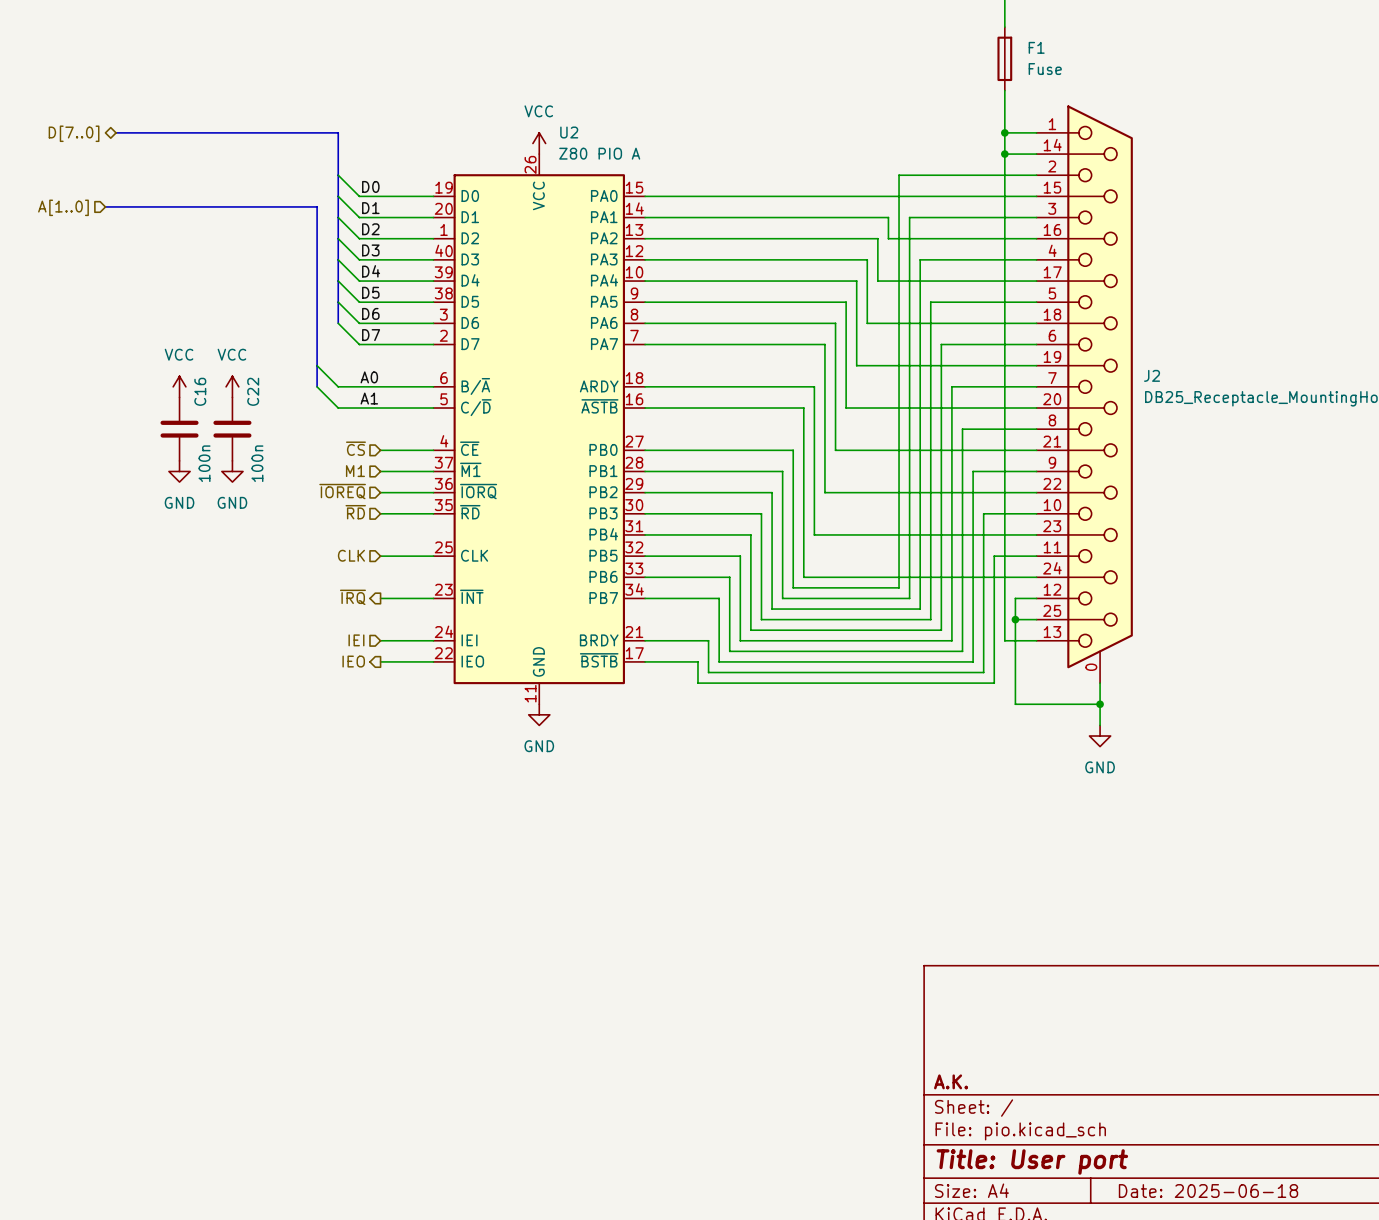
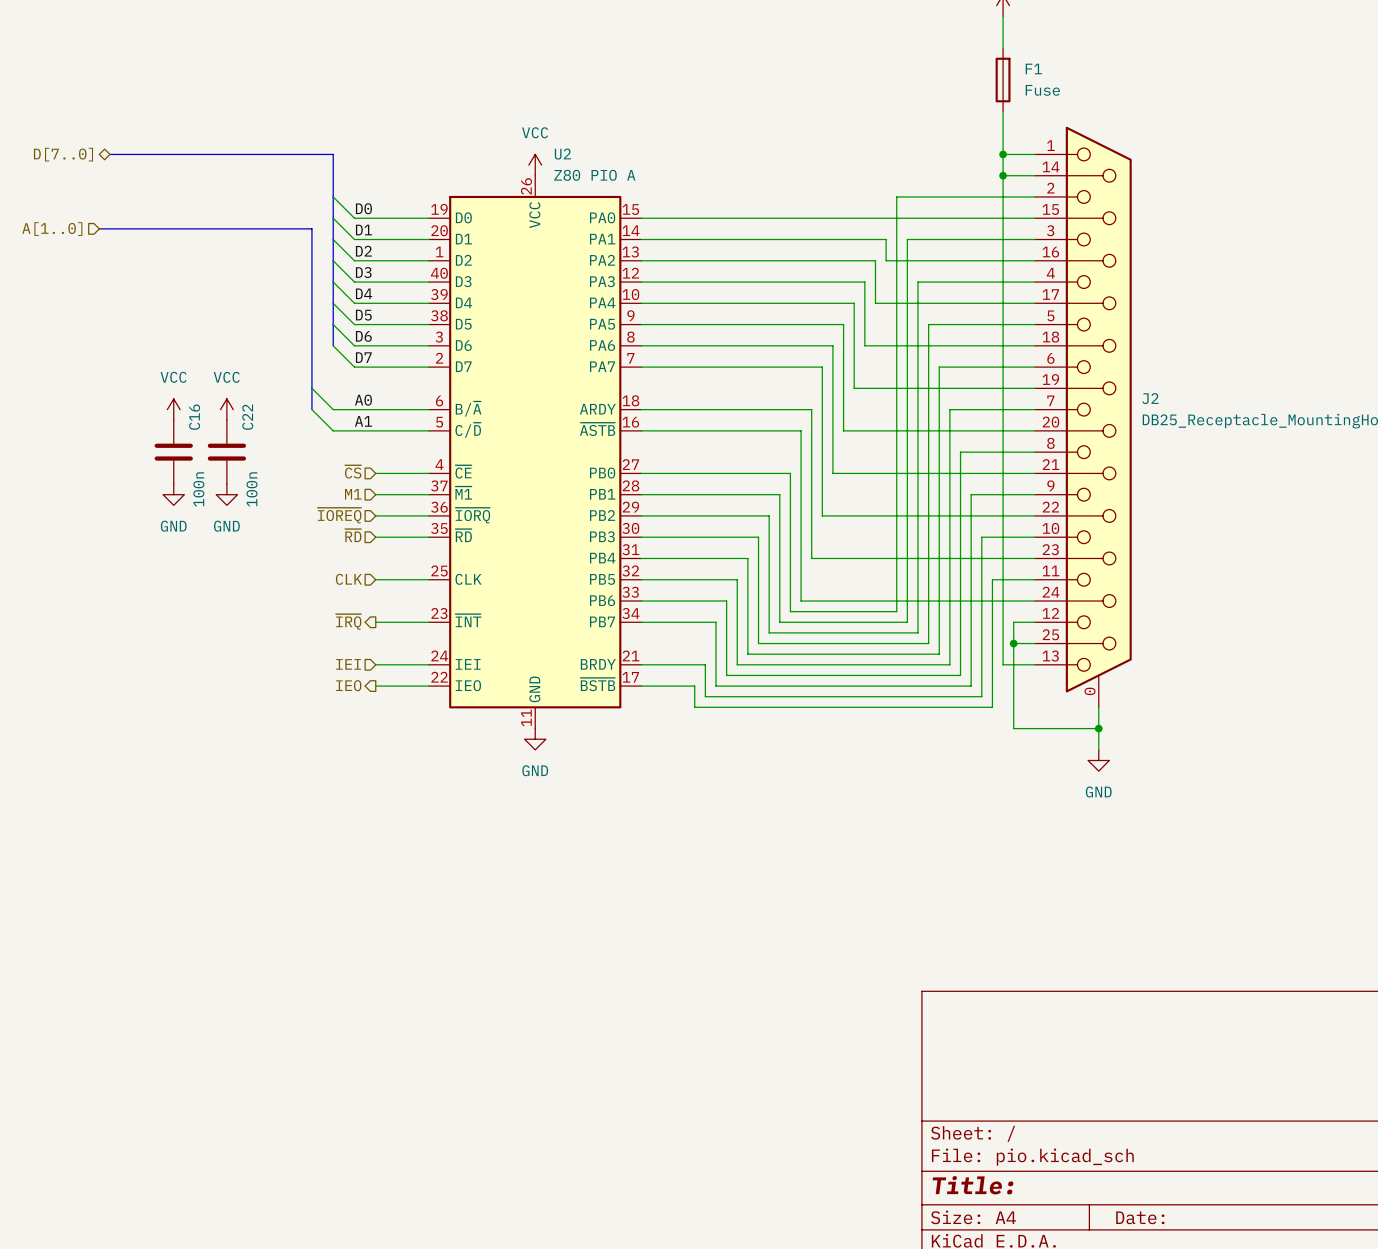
title block: A.K. (951, 1081) -> none
title block: Title: User port (1032, 1161) -> Title: (973, 1185)
title block: Date: 2025-06-18 (1208, 1191) -> Date: (1140, 1217)

